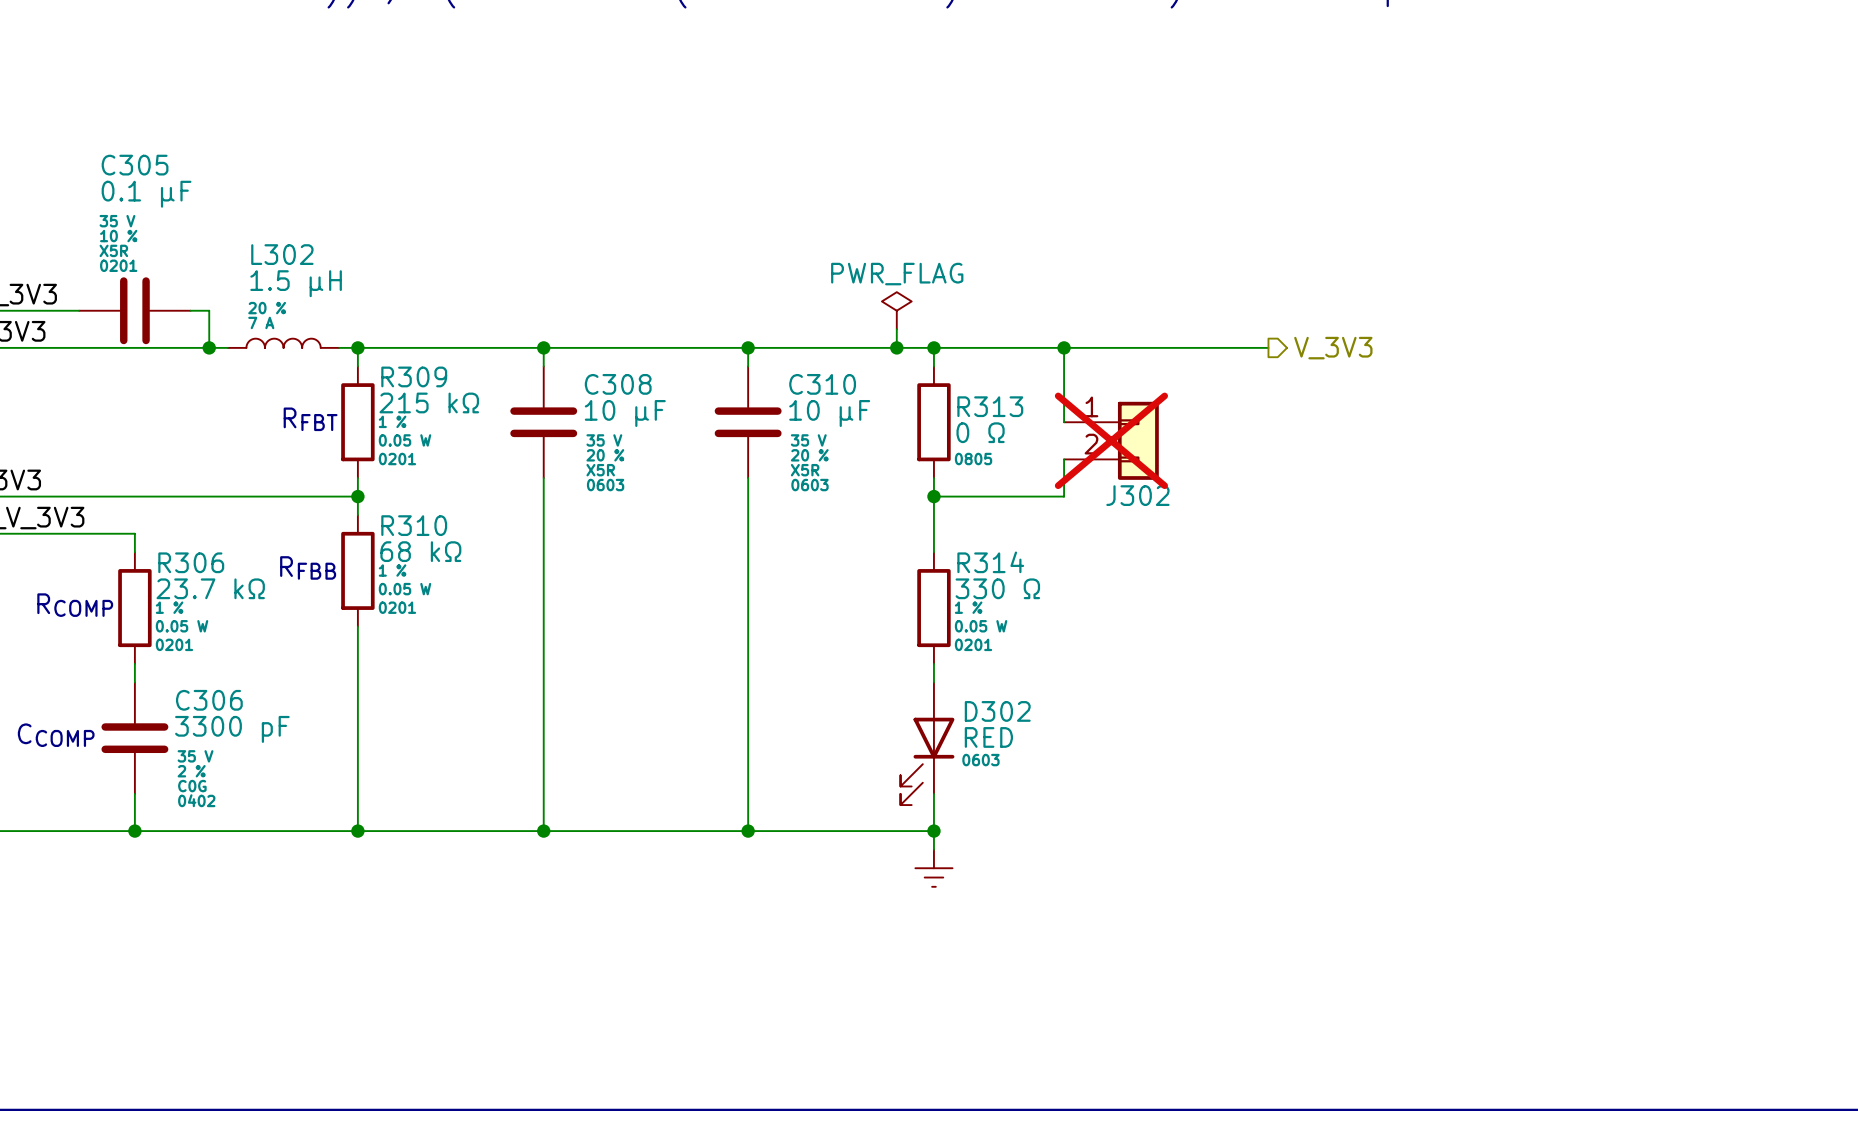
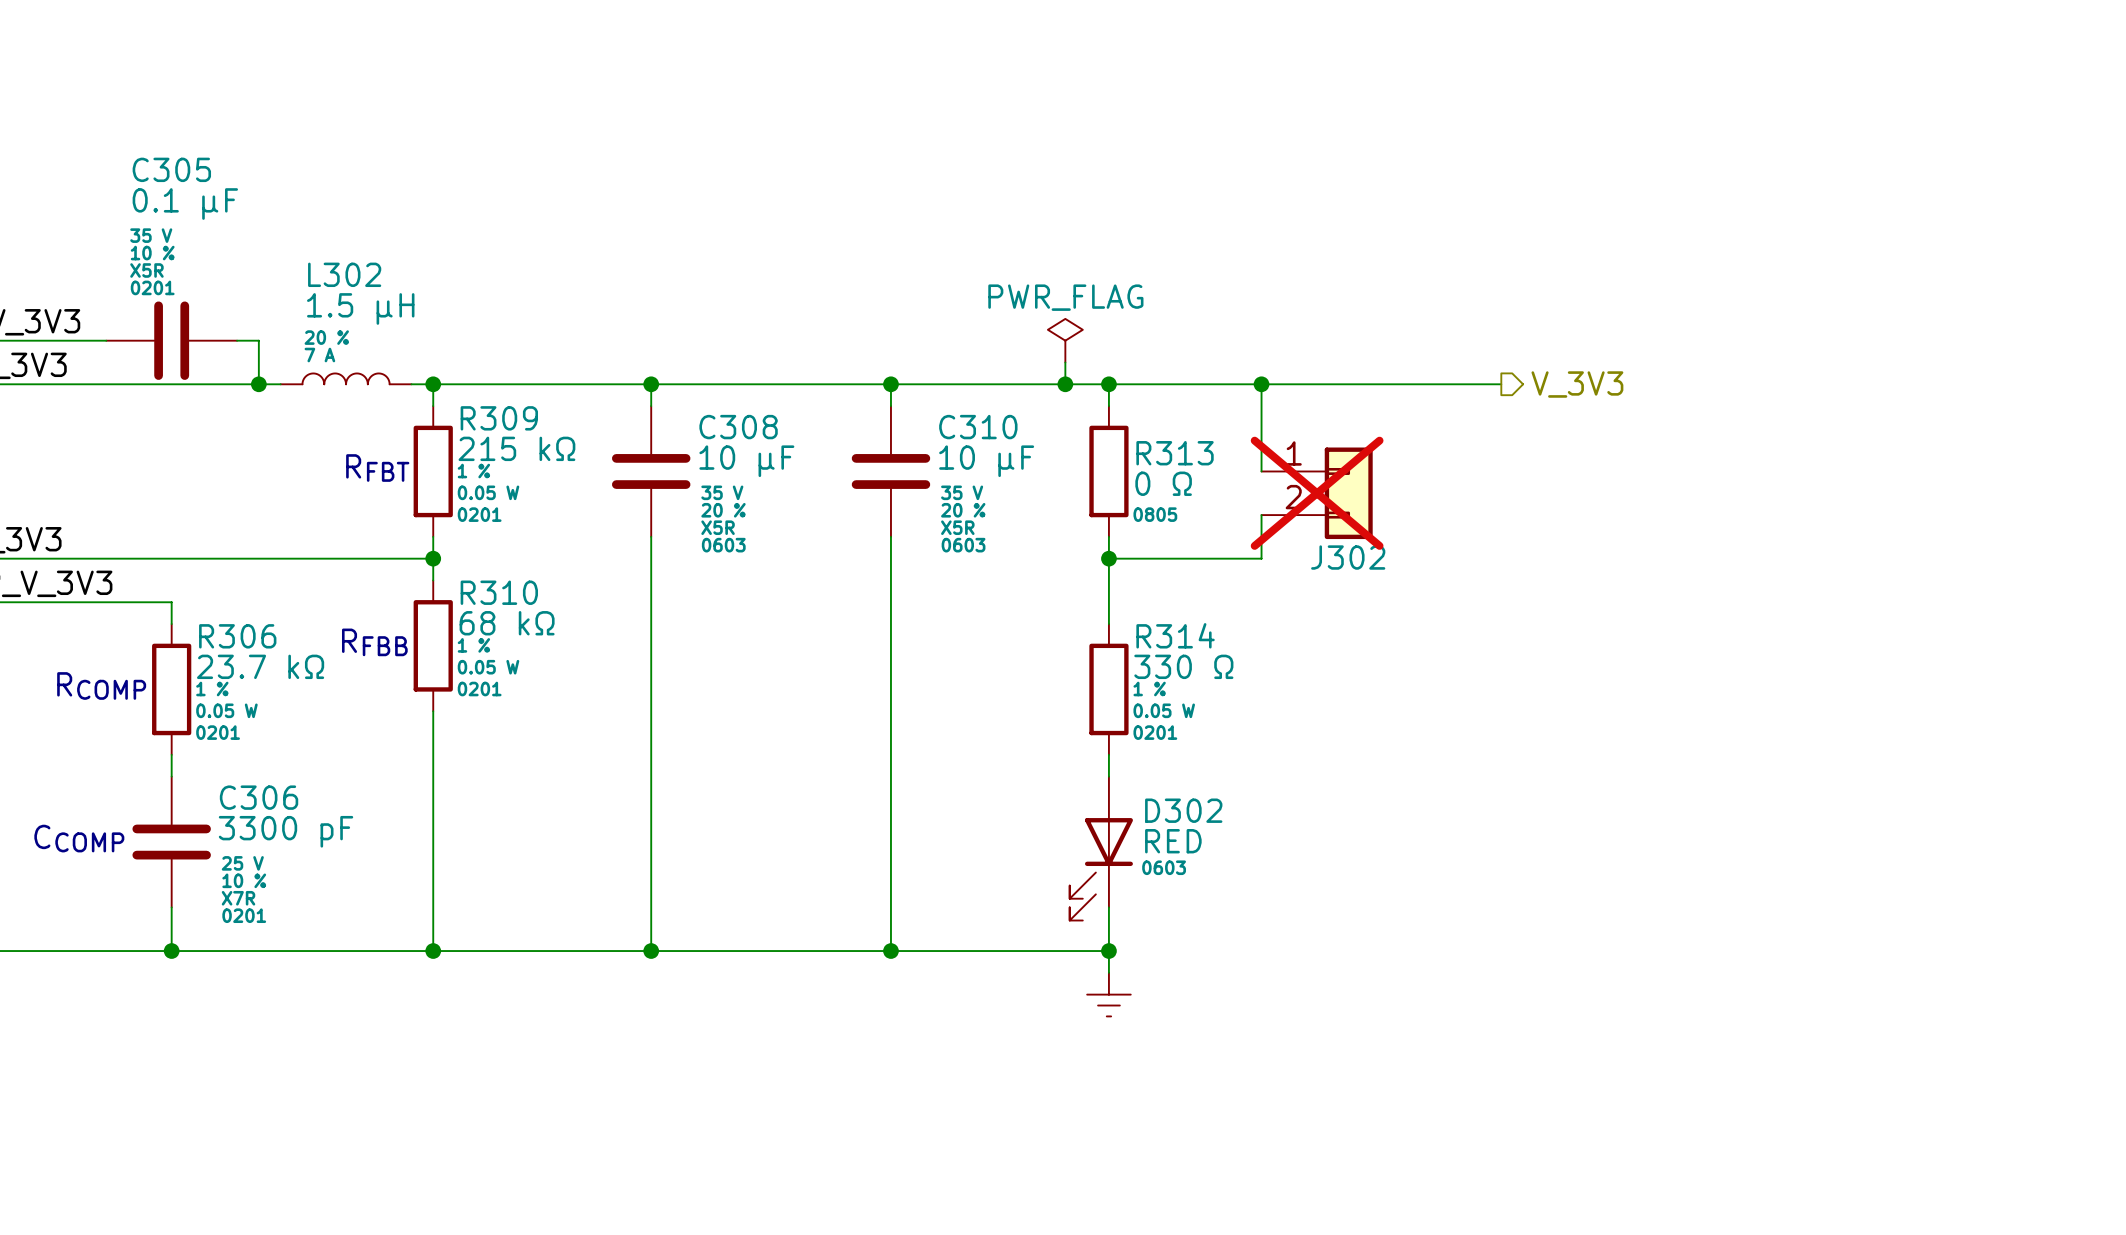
C306 text: 35 V (195, 756) -> 25 V (242, 863)
C306 text: 2 % (191, 771) -> 10 % (244, 880)
C306 text: C0G (192, 786) -> X7R (238, 898)
C306 text: 0402 (196, 800) -> 0201 (244, 915)

